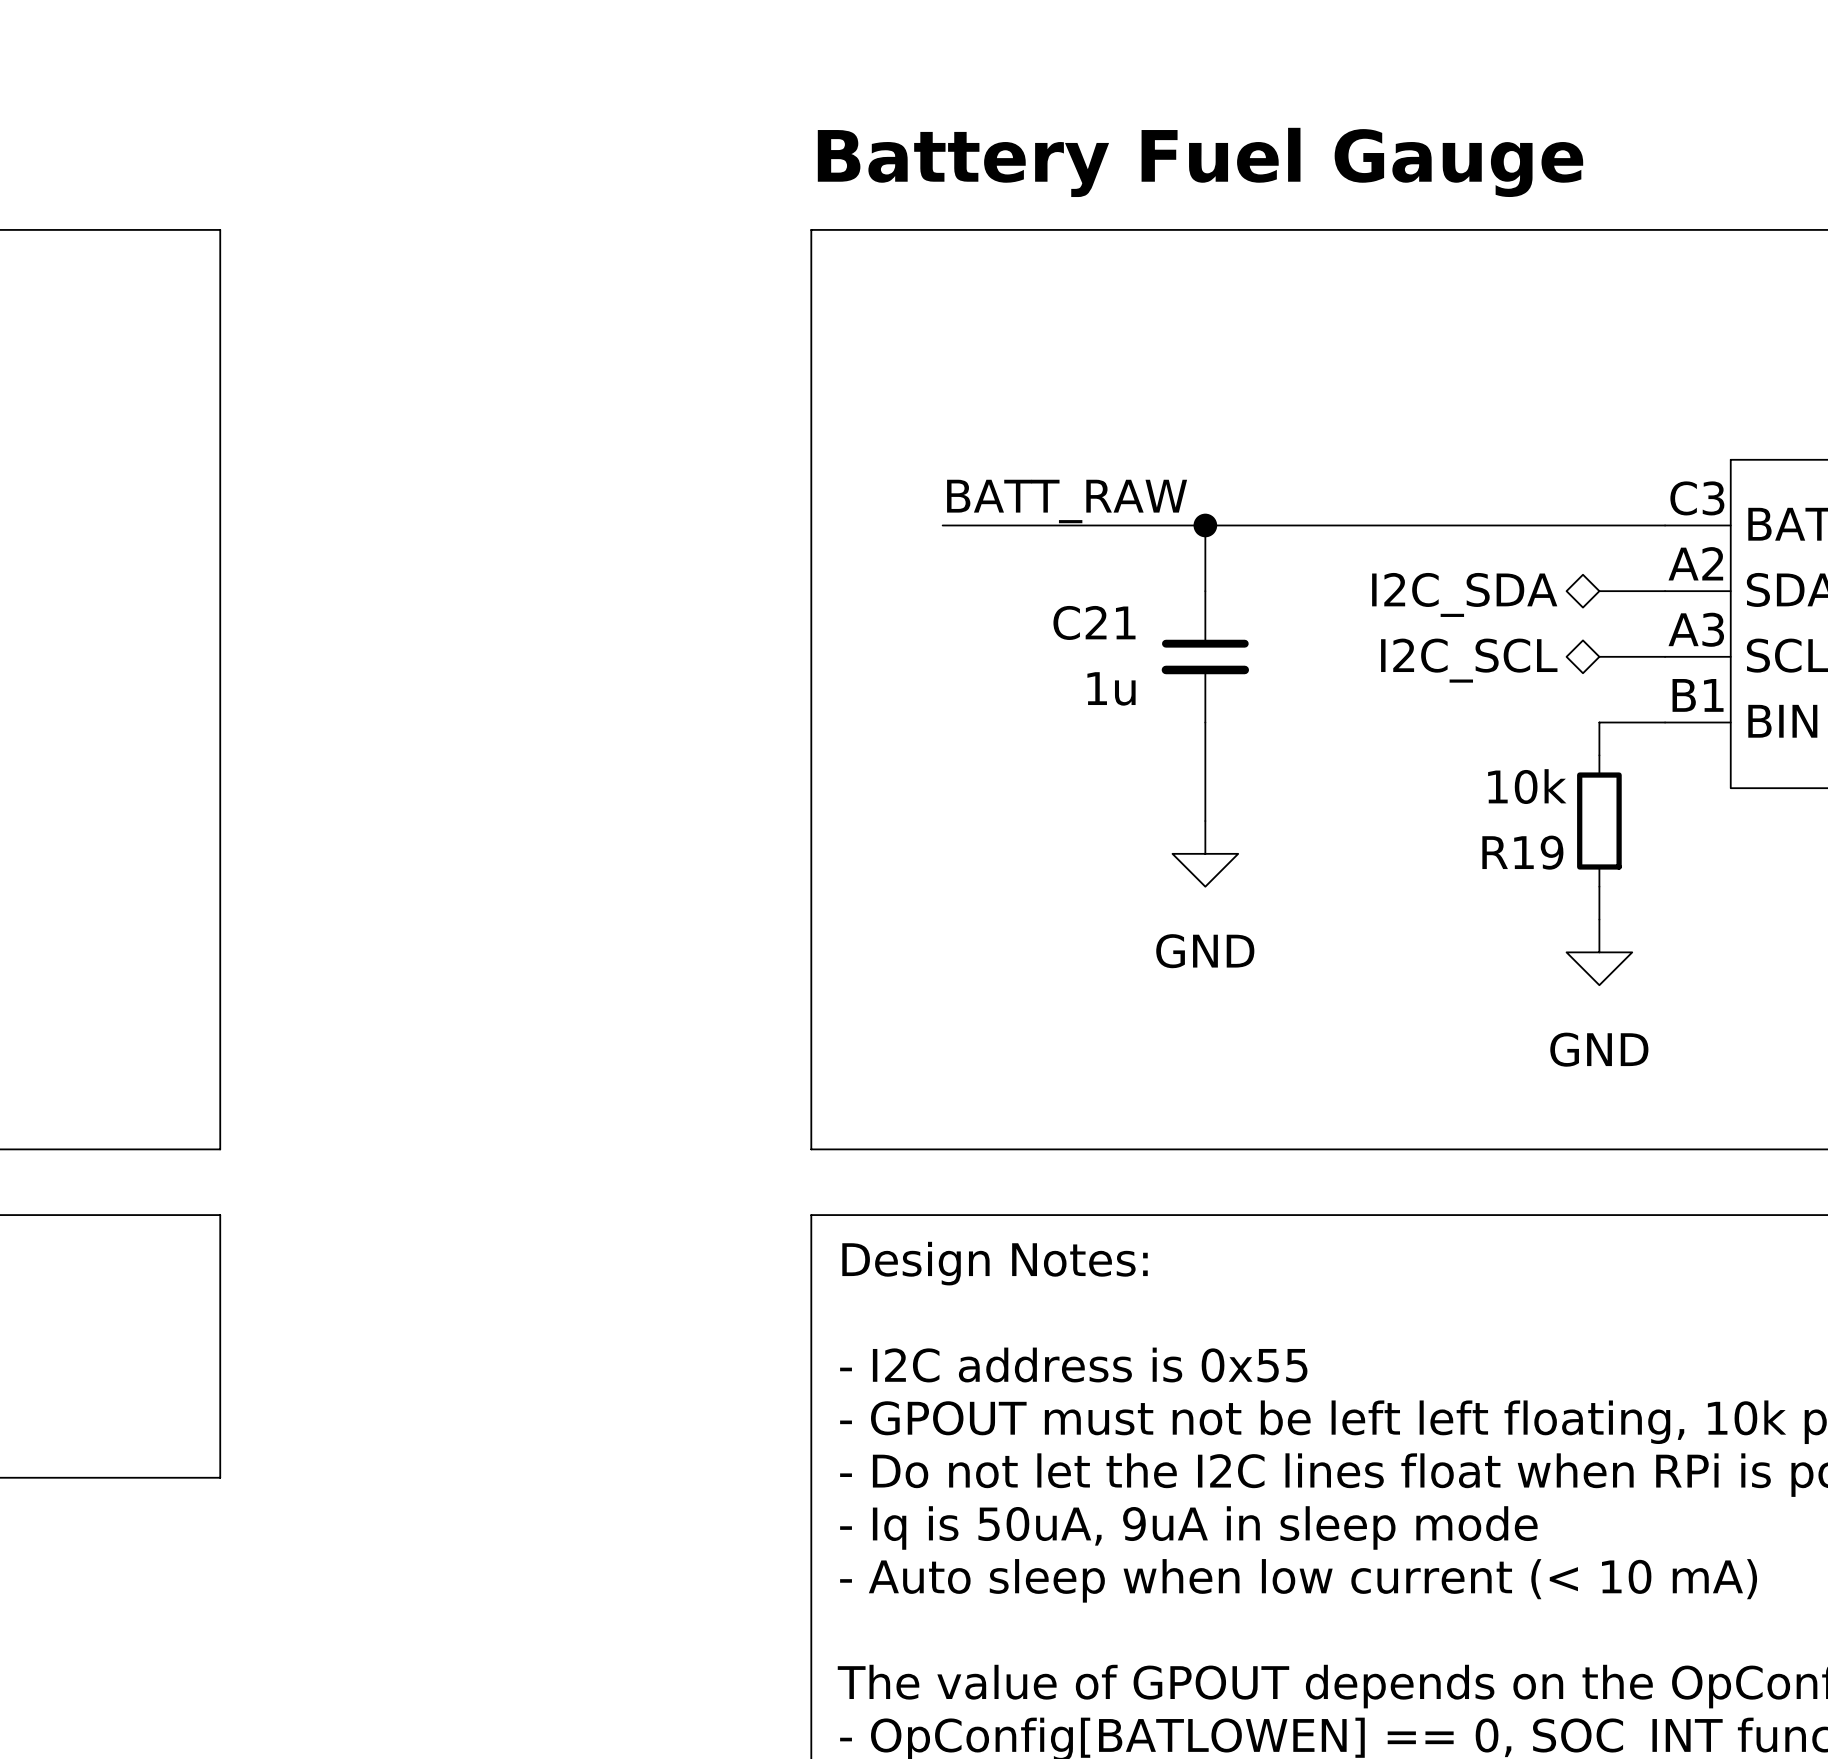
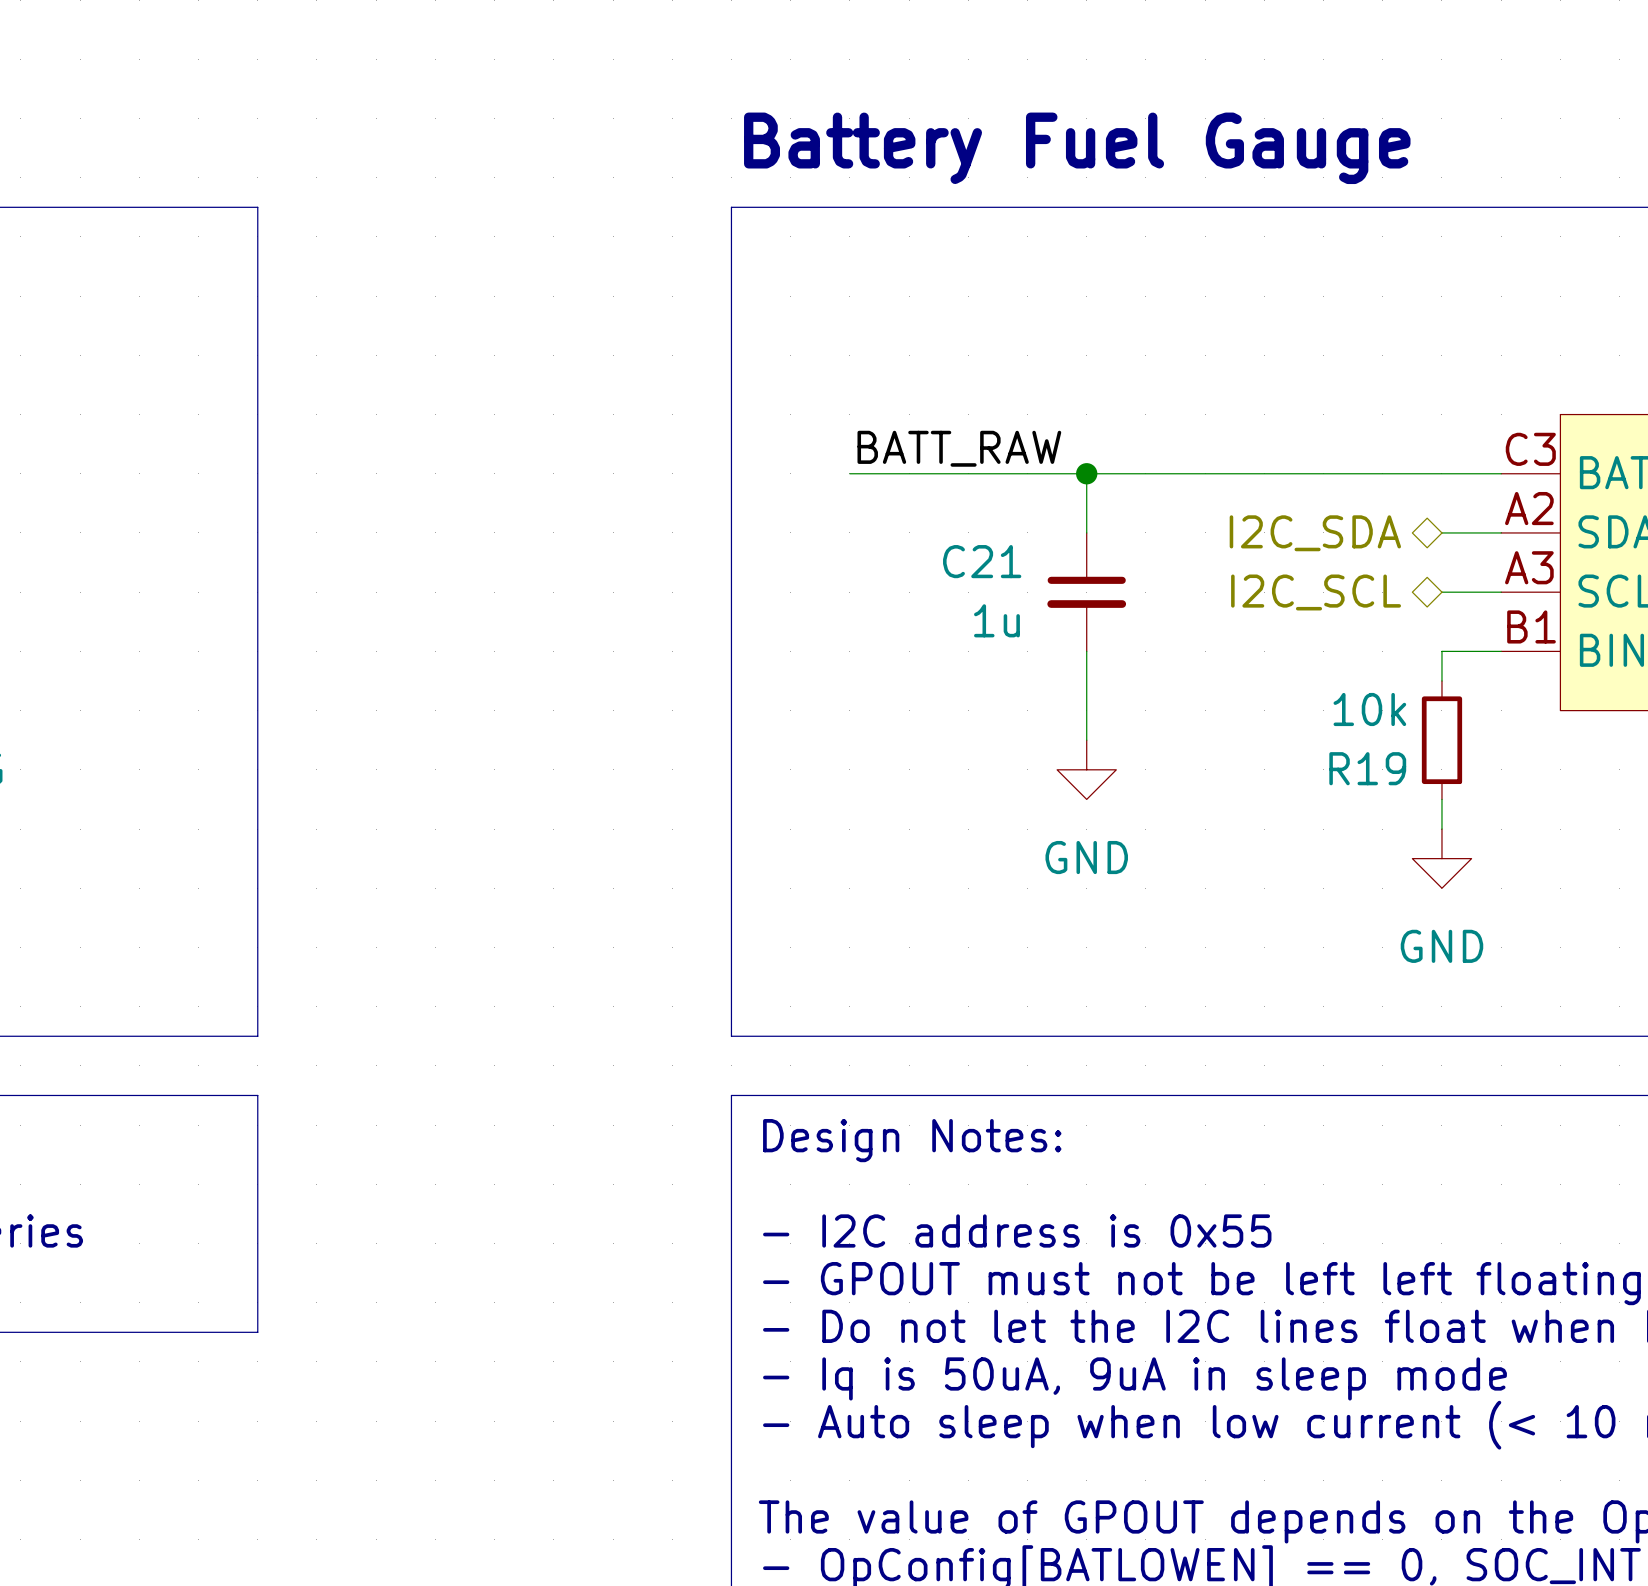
line: (220, 229) (220, 1149) -> (198, 207) (257, 207) (257, 1036) (198, 1036)
line: (220, 1215) (220, 1477) -> (198, 1095) (257, 1095) (257, 1332) (198, 1332)

